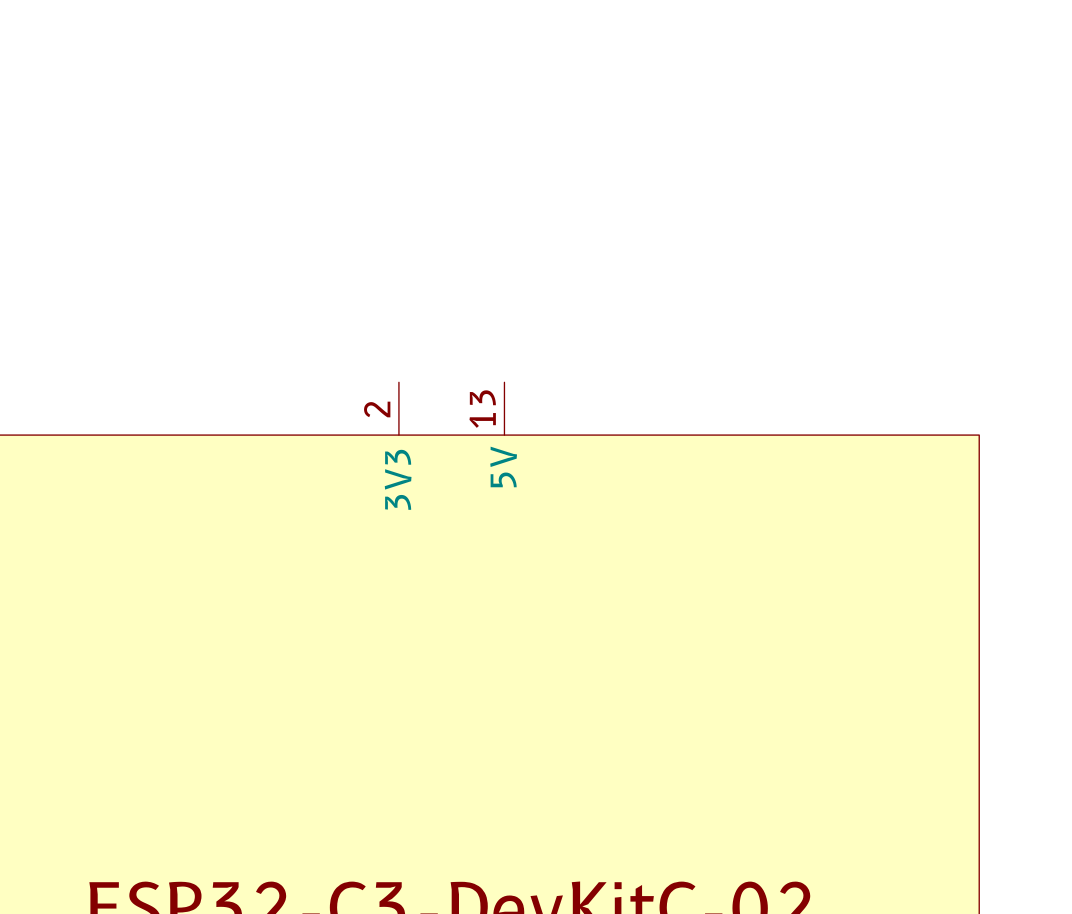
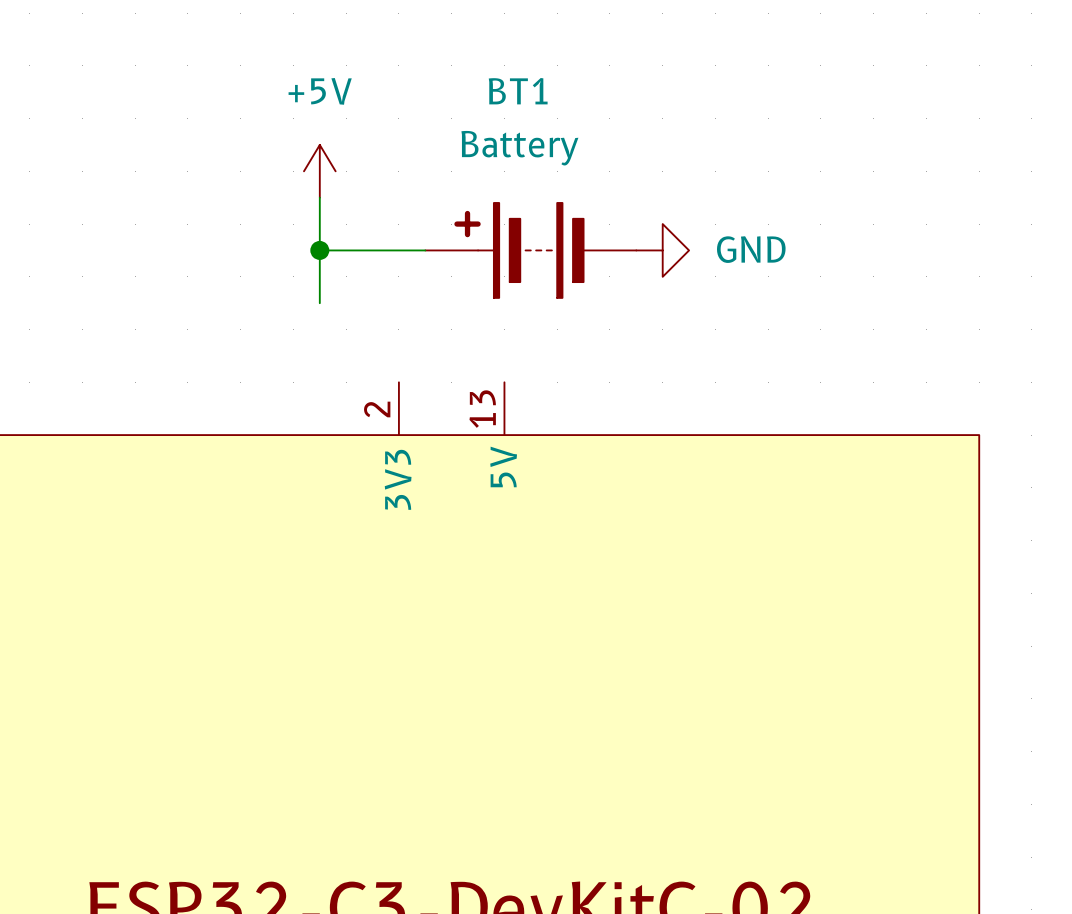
power symbol: none -> +5V (319, 171)
wire: none -> (319, 197) (319, 303)
wire: none -> (319, 250) (425, 250)
junction: none -> (319, 250)
BT1: none -> Battery (530, 250)
power symbol: none -> GND (662, 250)

